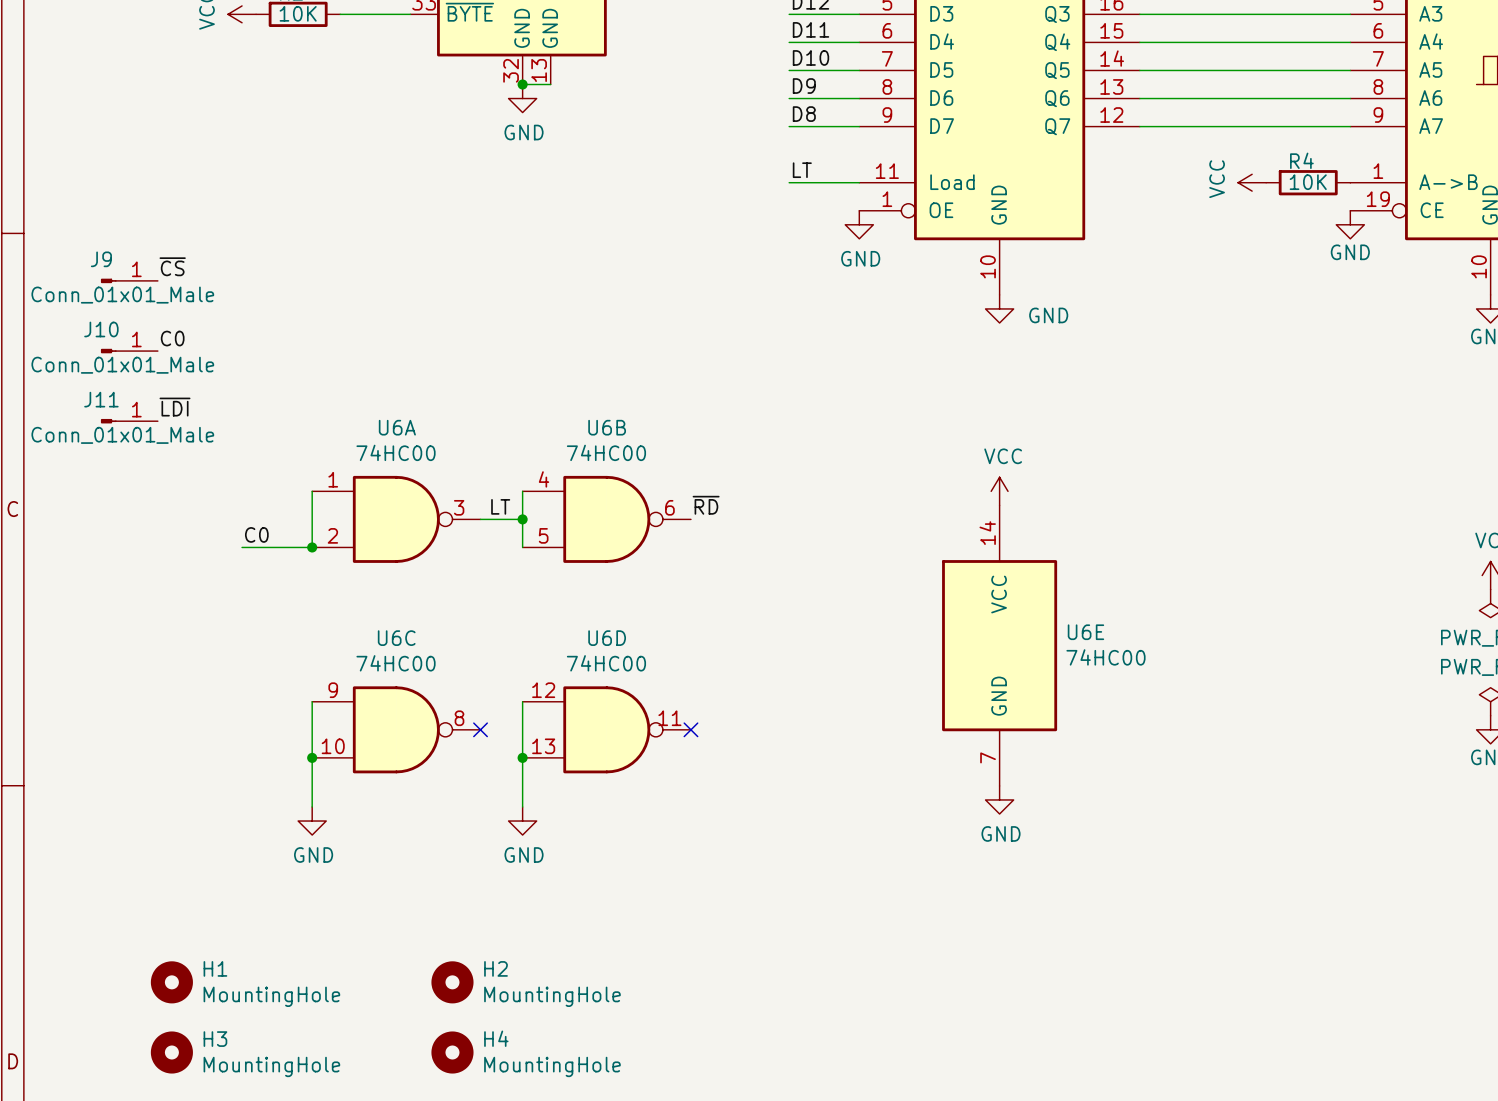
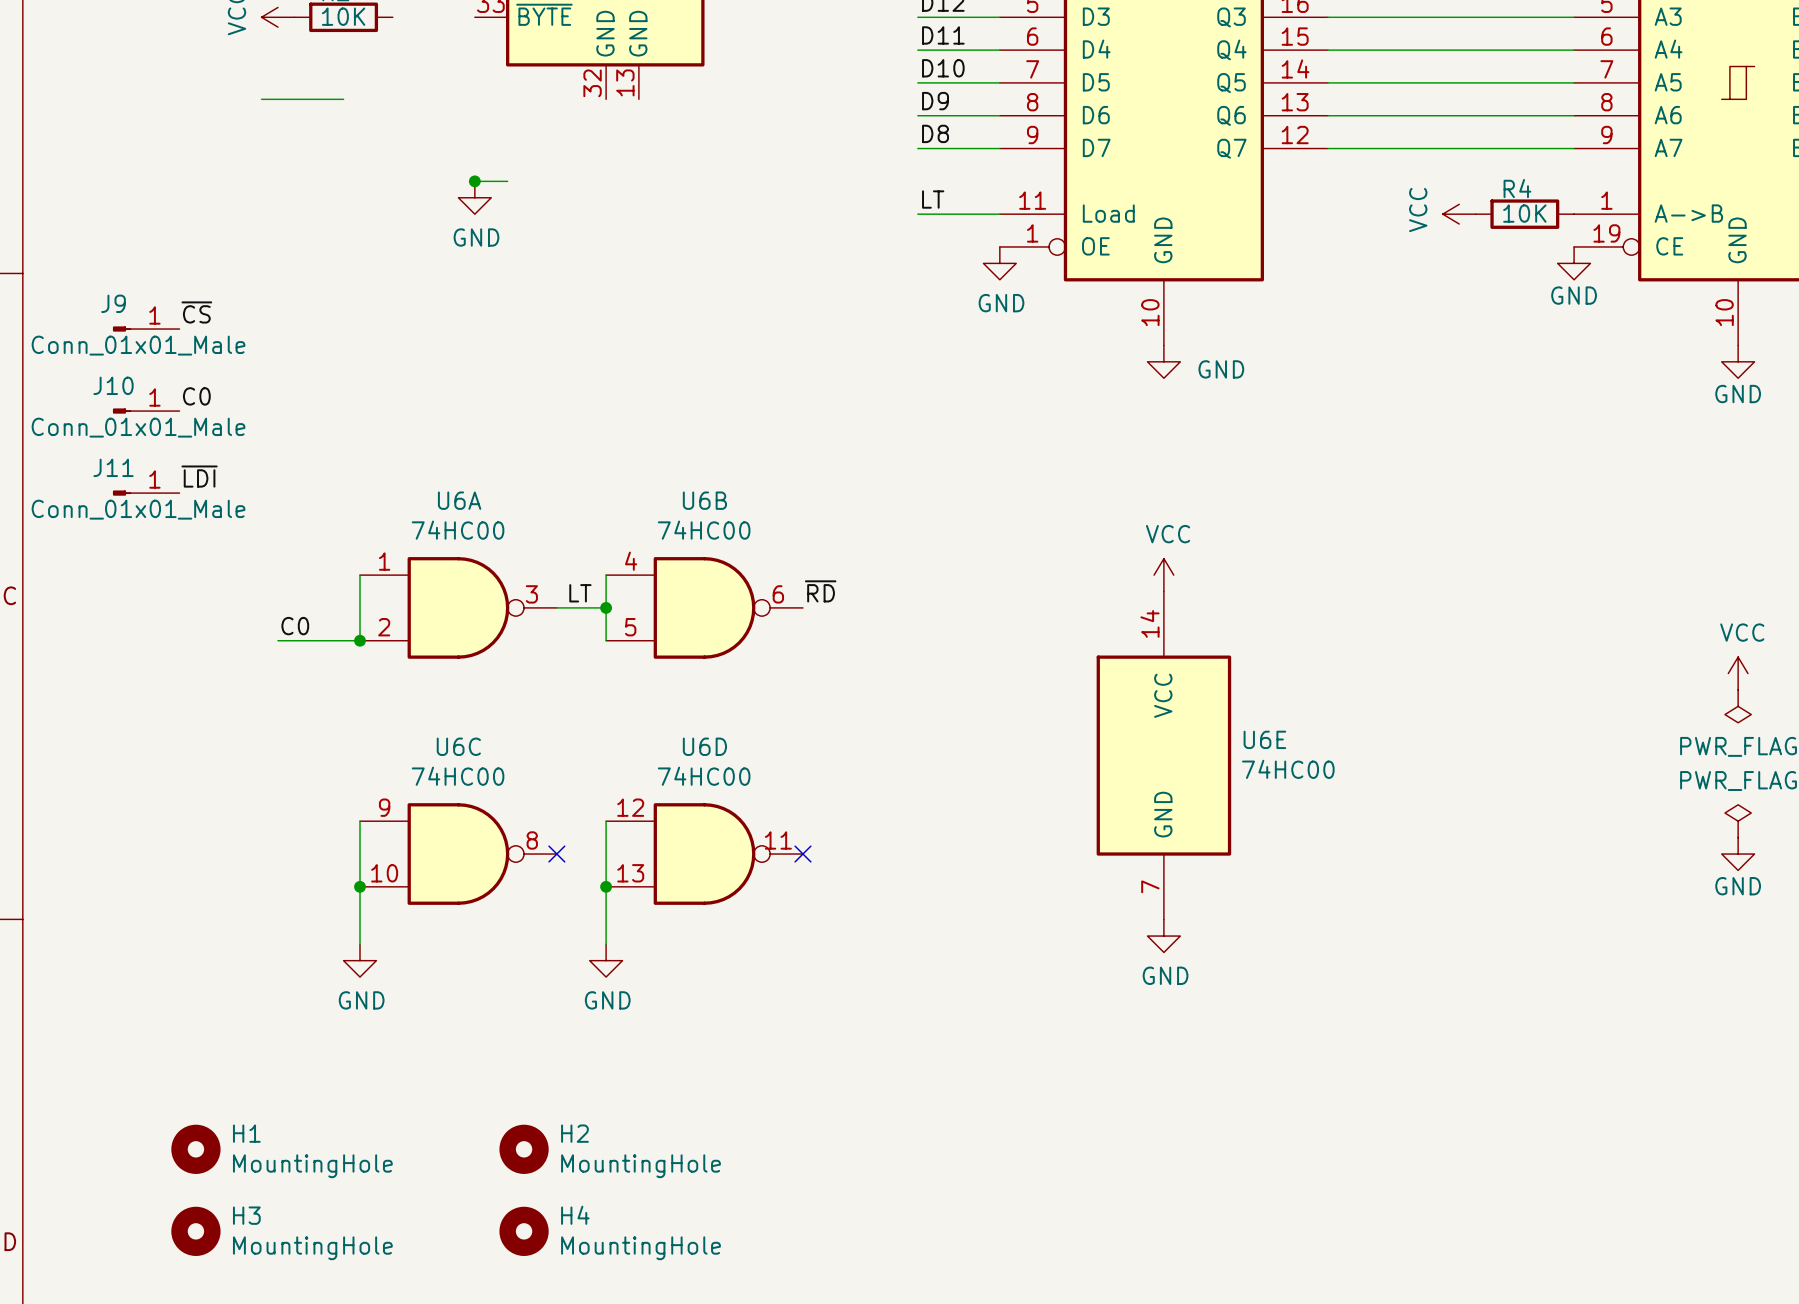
wire: (340, 14) (410, 14) -> (261, 99) (343, 99)
wire: (522, 84) (550, 84) -> (474, 181) (507, 181)
junction: (522, 84) -> none
power symbol position: GND (522, 98) -> GND (474, 197)
junction: none -> (474, 181)

